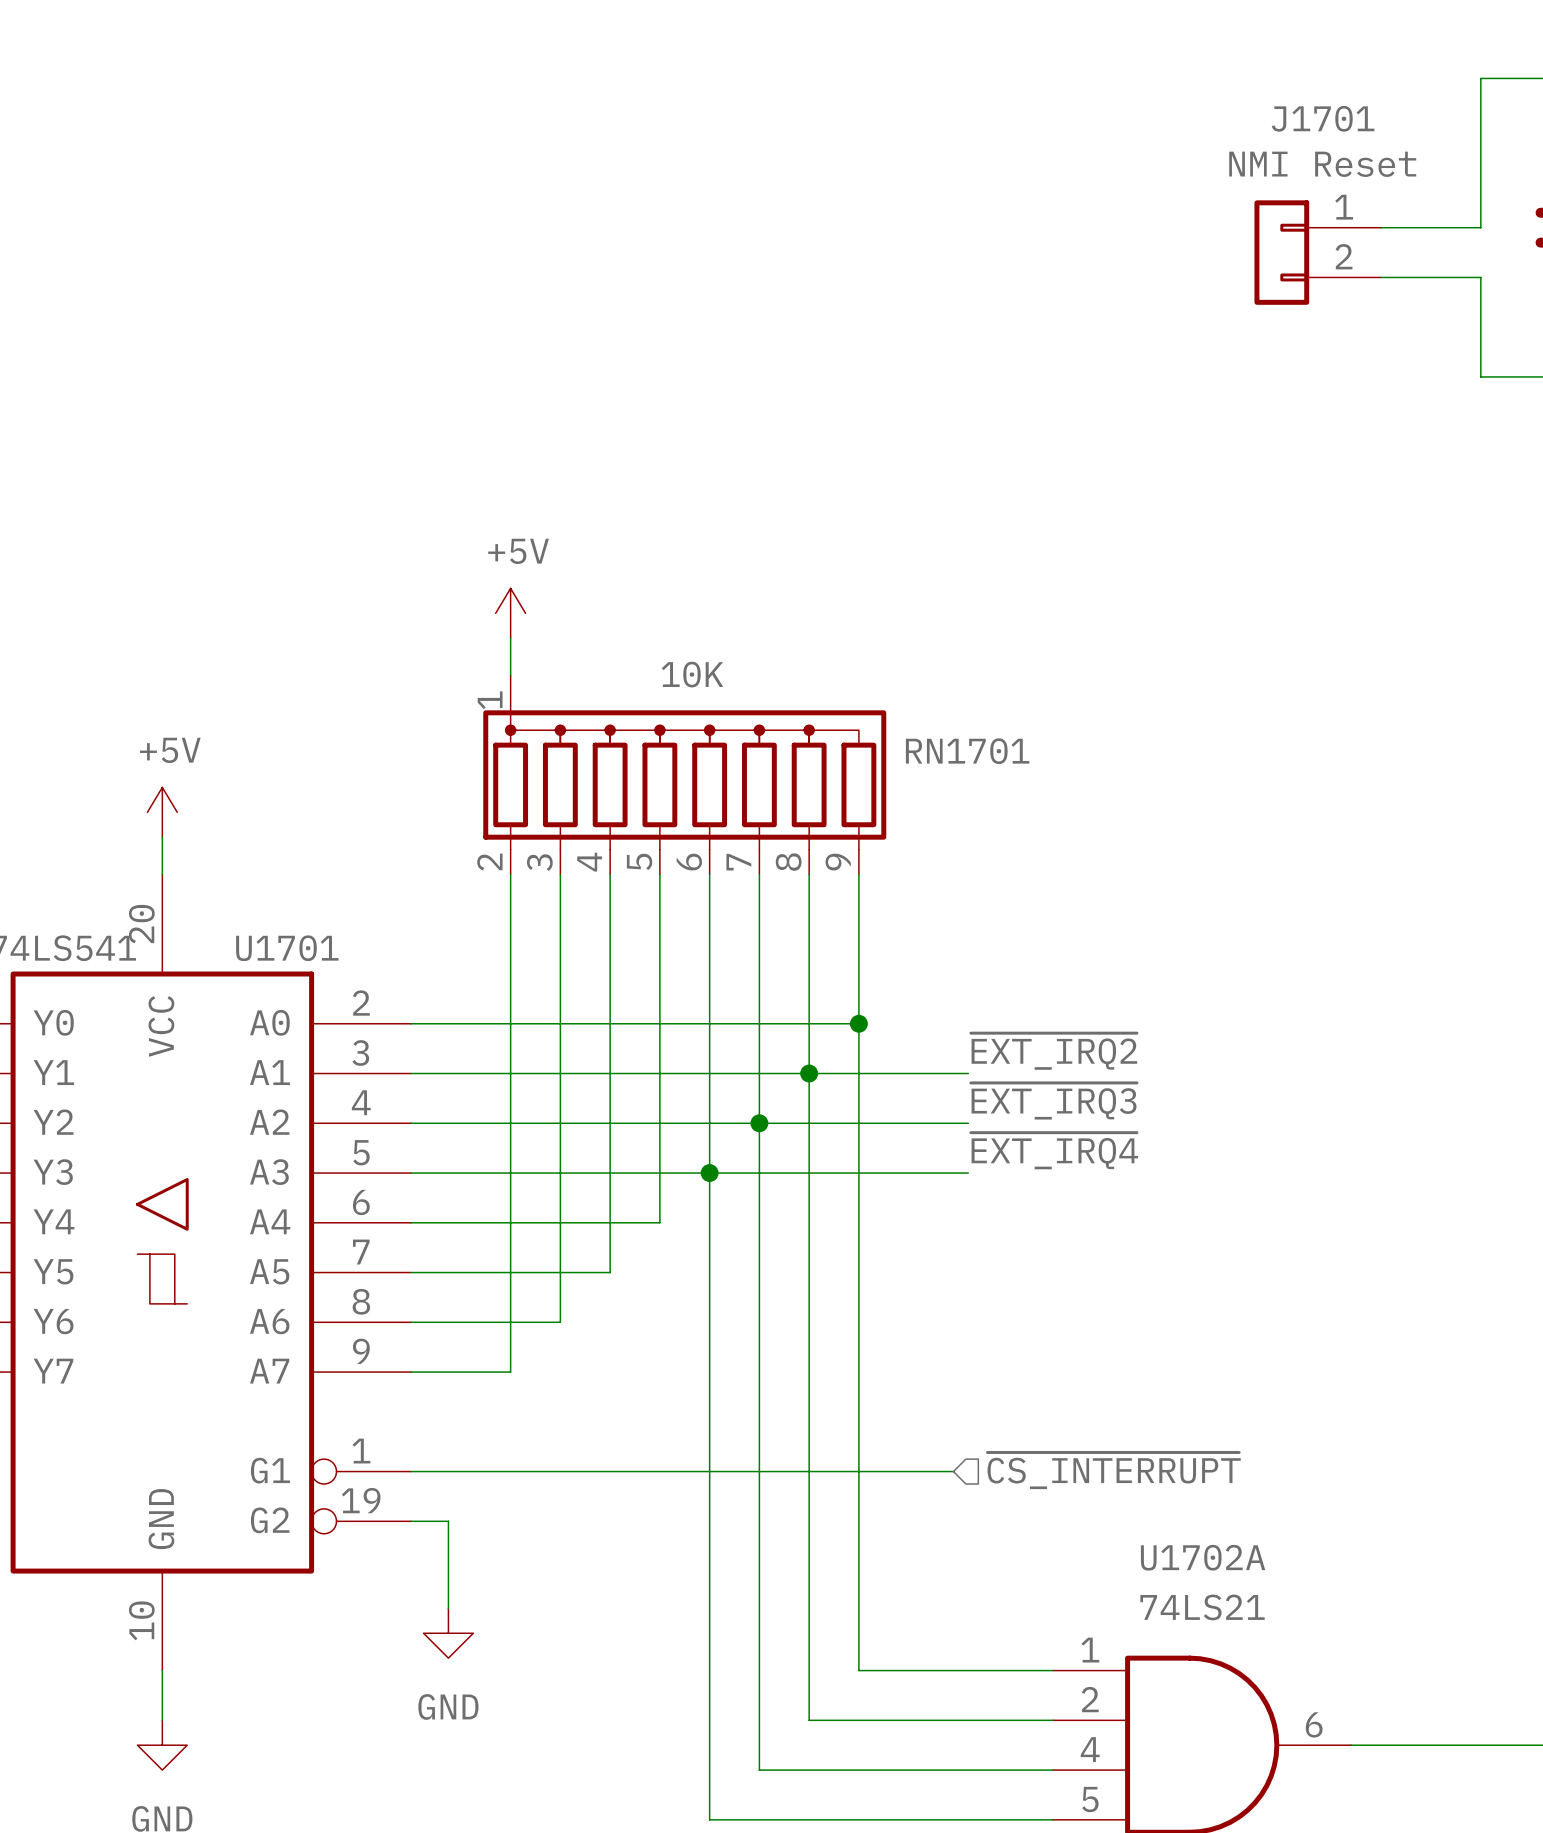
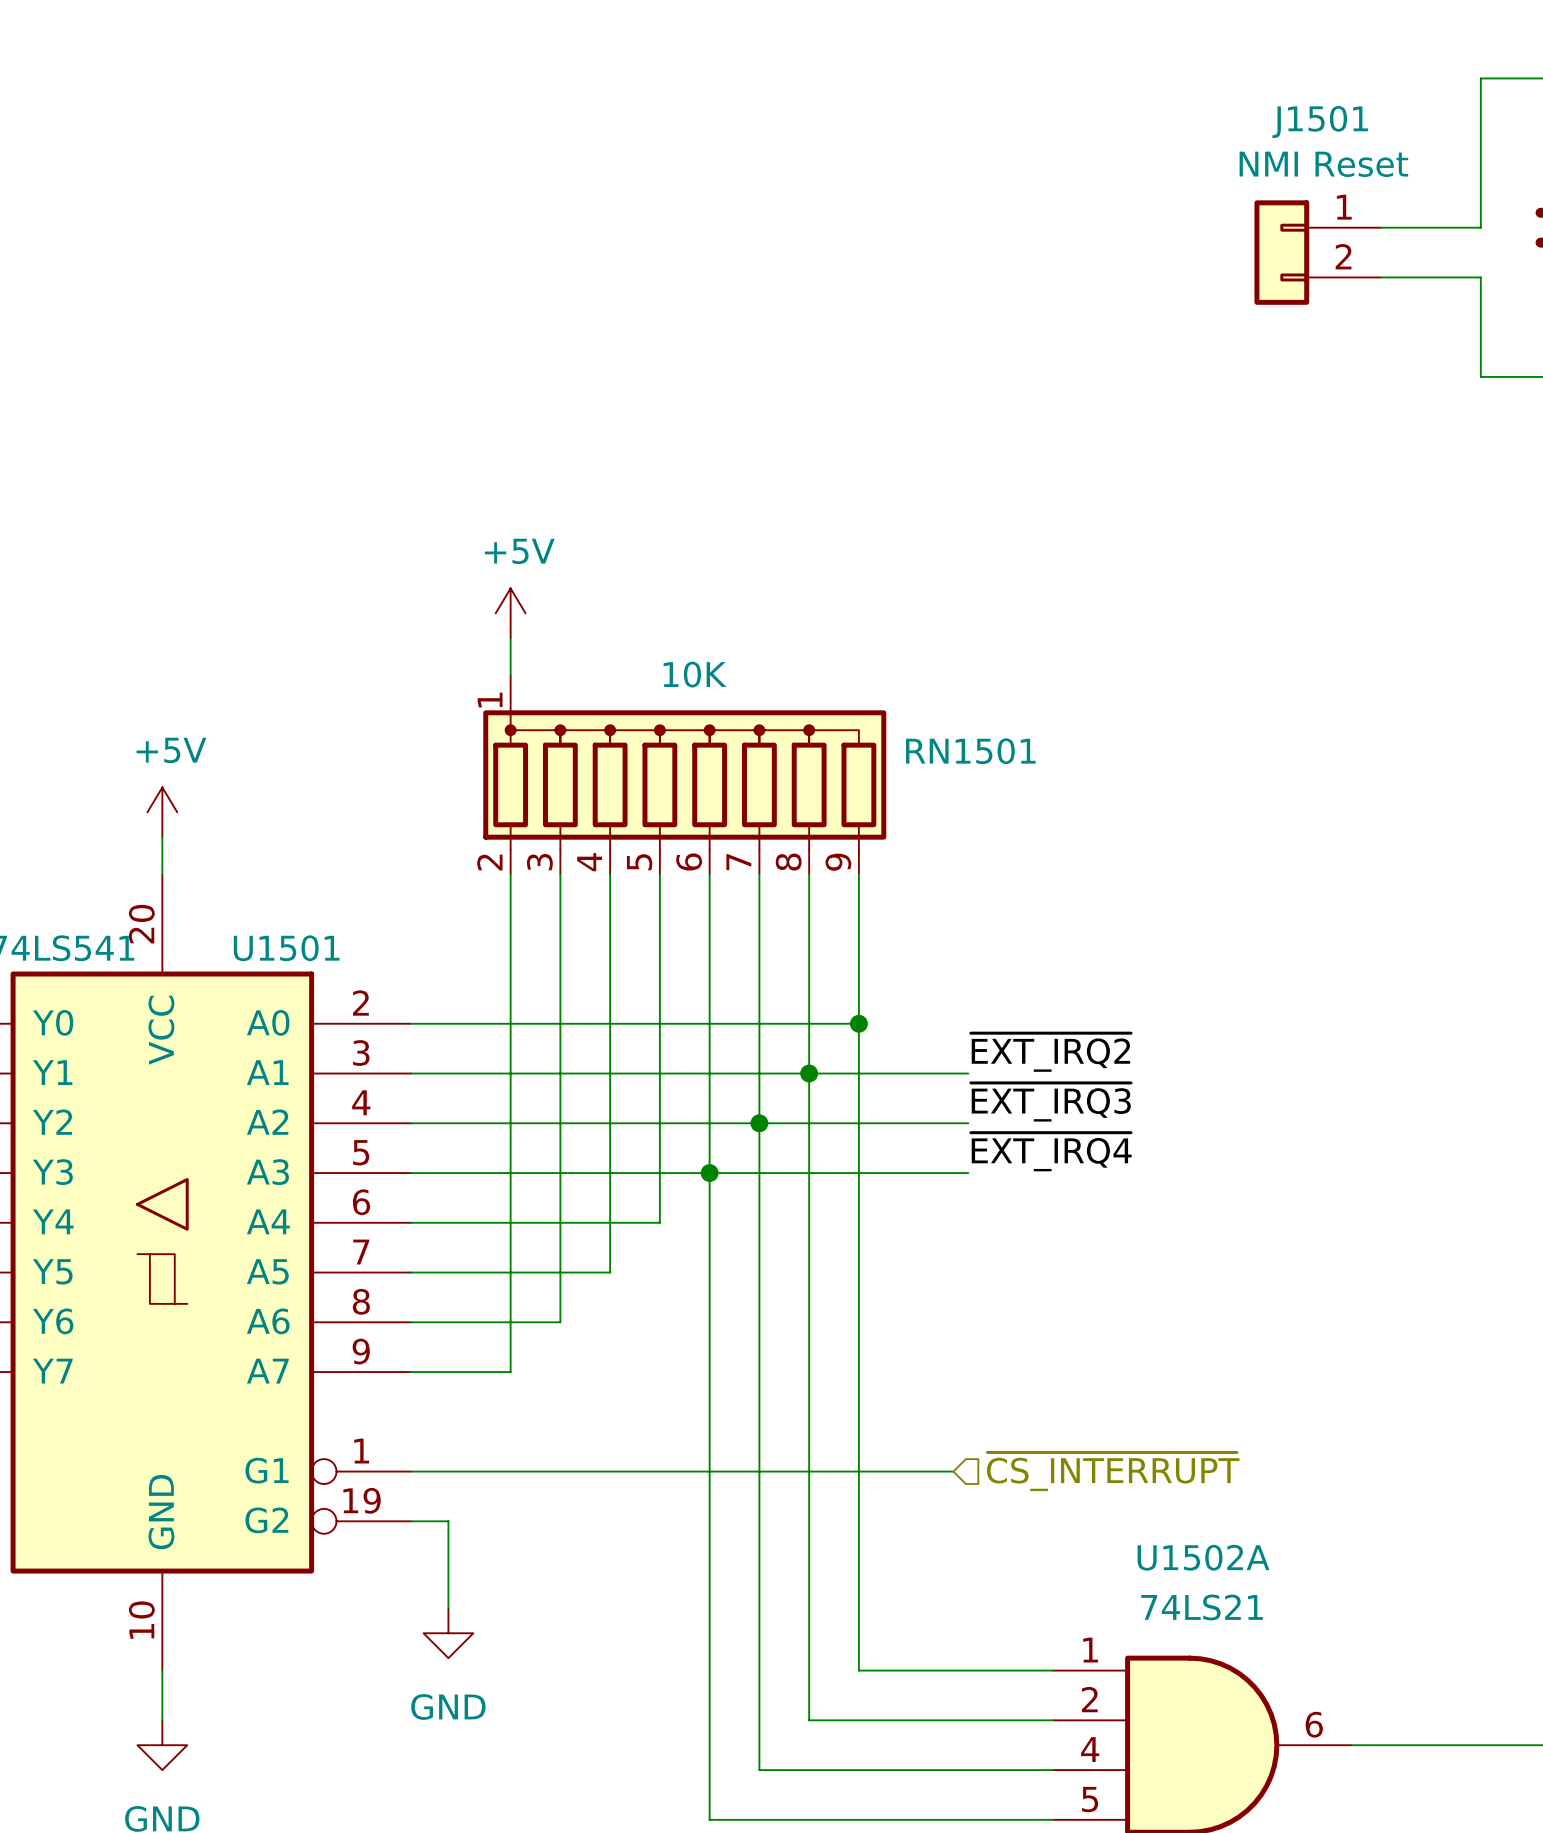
J1701 name: J1701 (1323, 118) -> J1501 (1320, 122)
RN1701 name: RN1701 (967, 751) -> RN1501 (970, 751)
U1701 name: U1701 (287, 948) -> U1501 (286, 948)
U1702A name: U1702A (1203, 1557) -> U1502A (1203, 1557)

